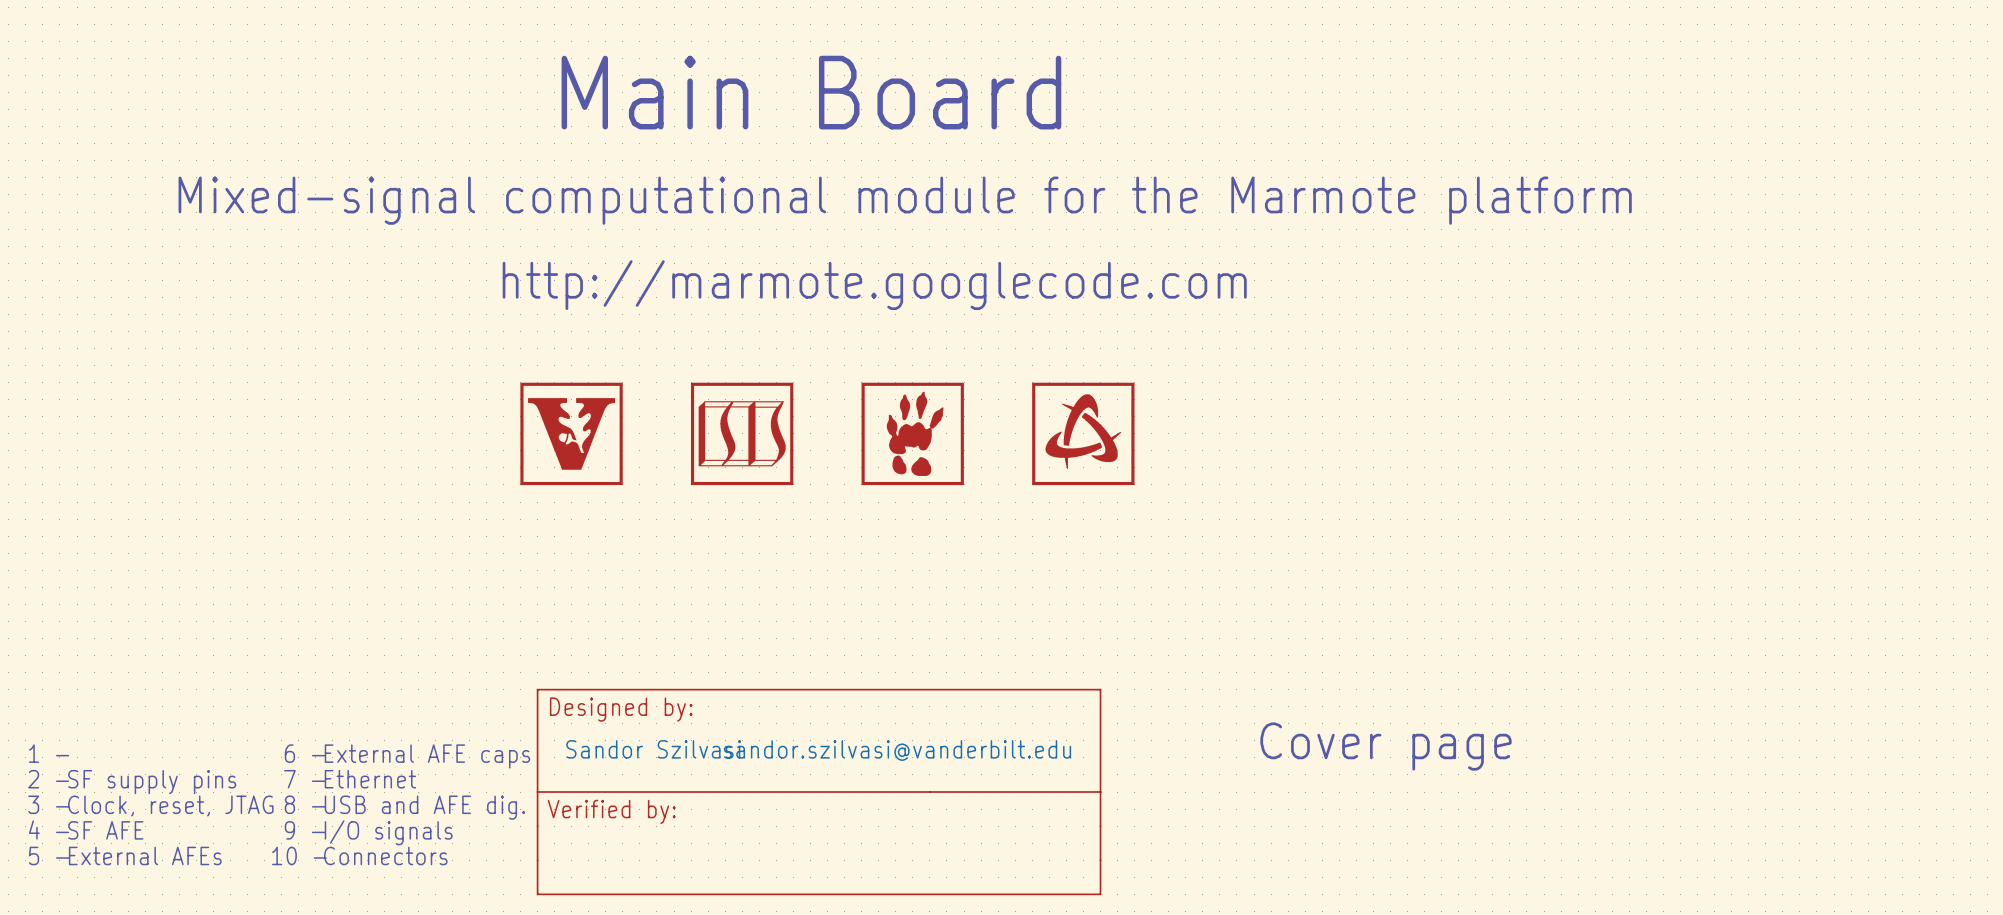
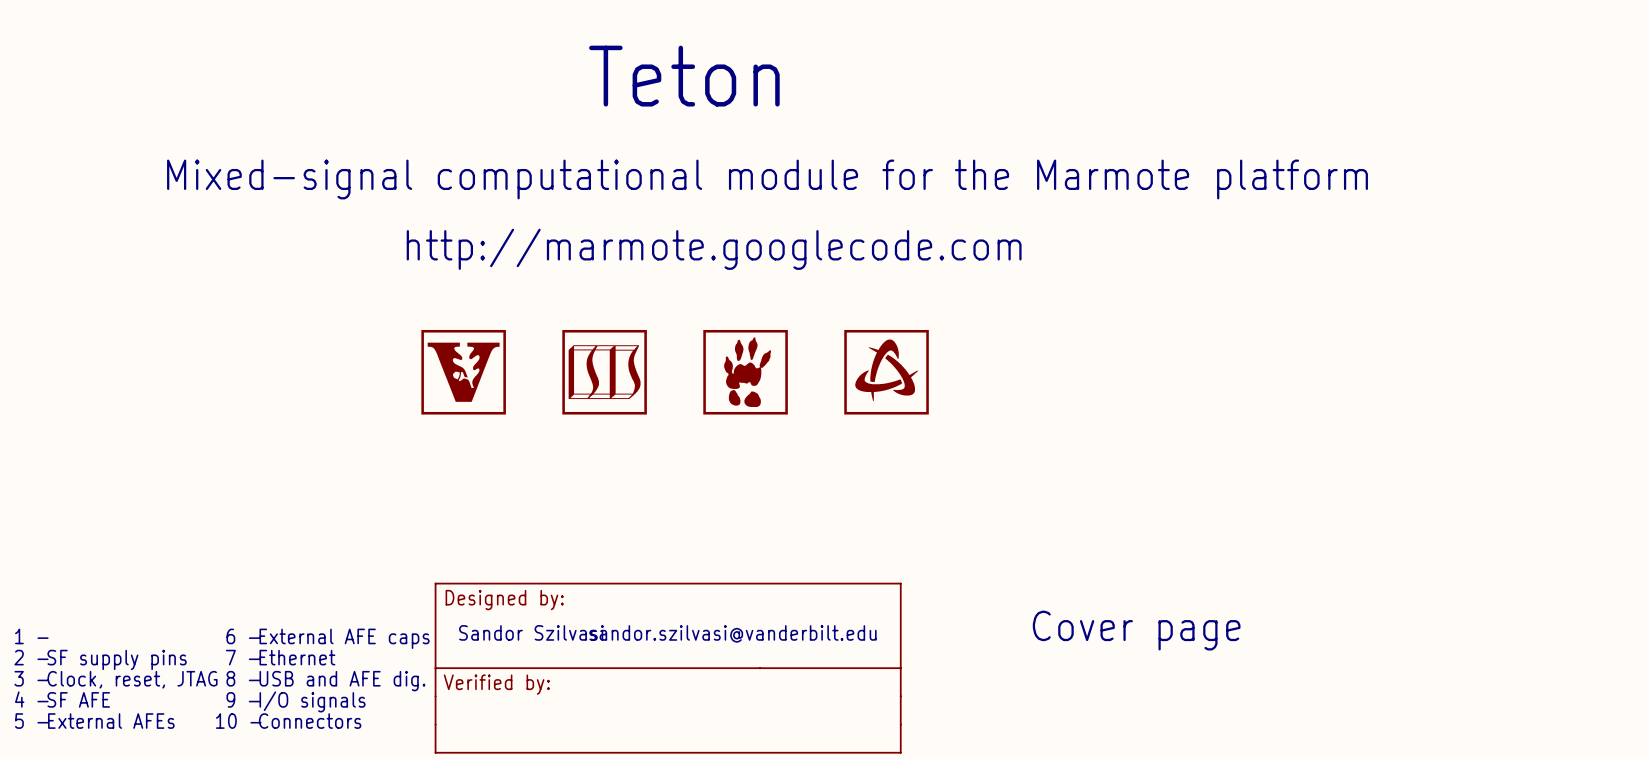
text: none -> Teton (684, 76)
text: Main Board (811, 92) -> none
text position: Mixed-signal computational module for the Marmote platform (905, 200) -> Mixed-signal computational module for the Marmote platform (767, 179)

